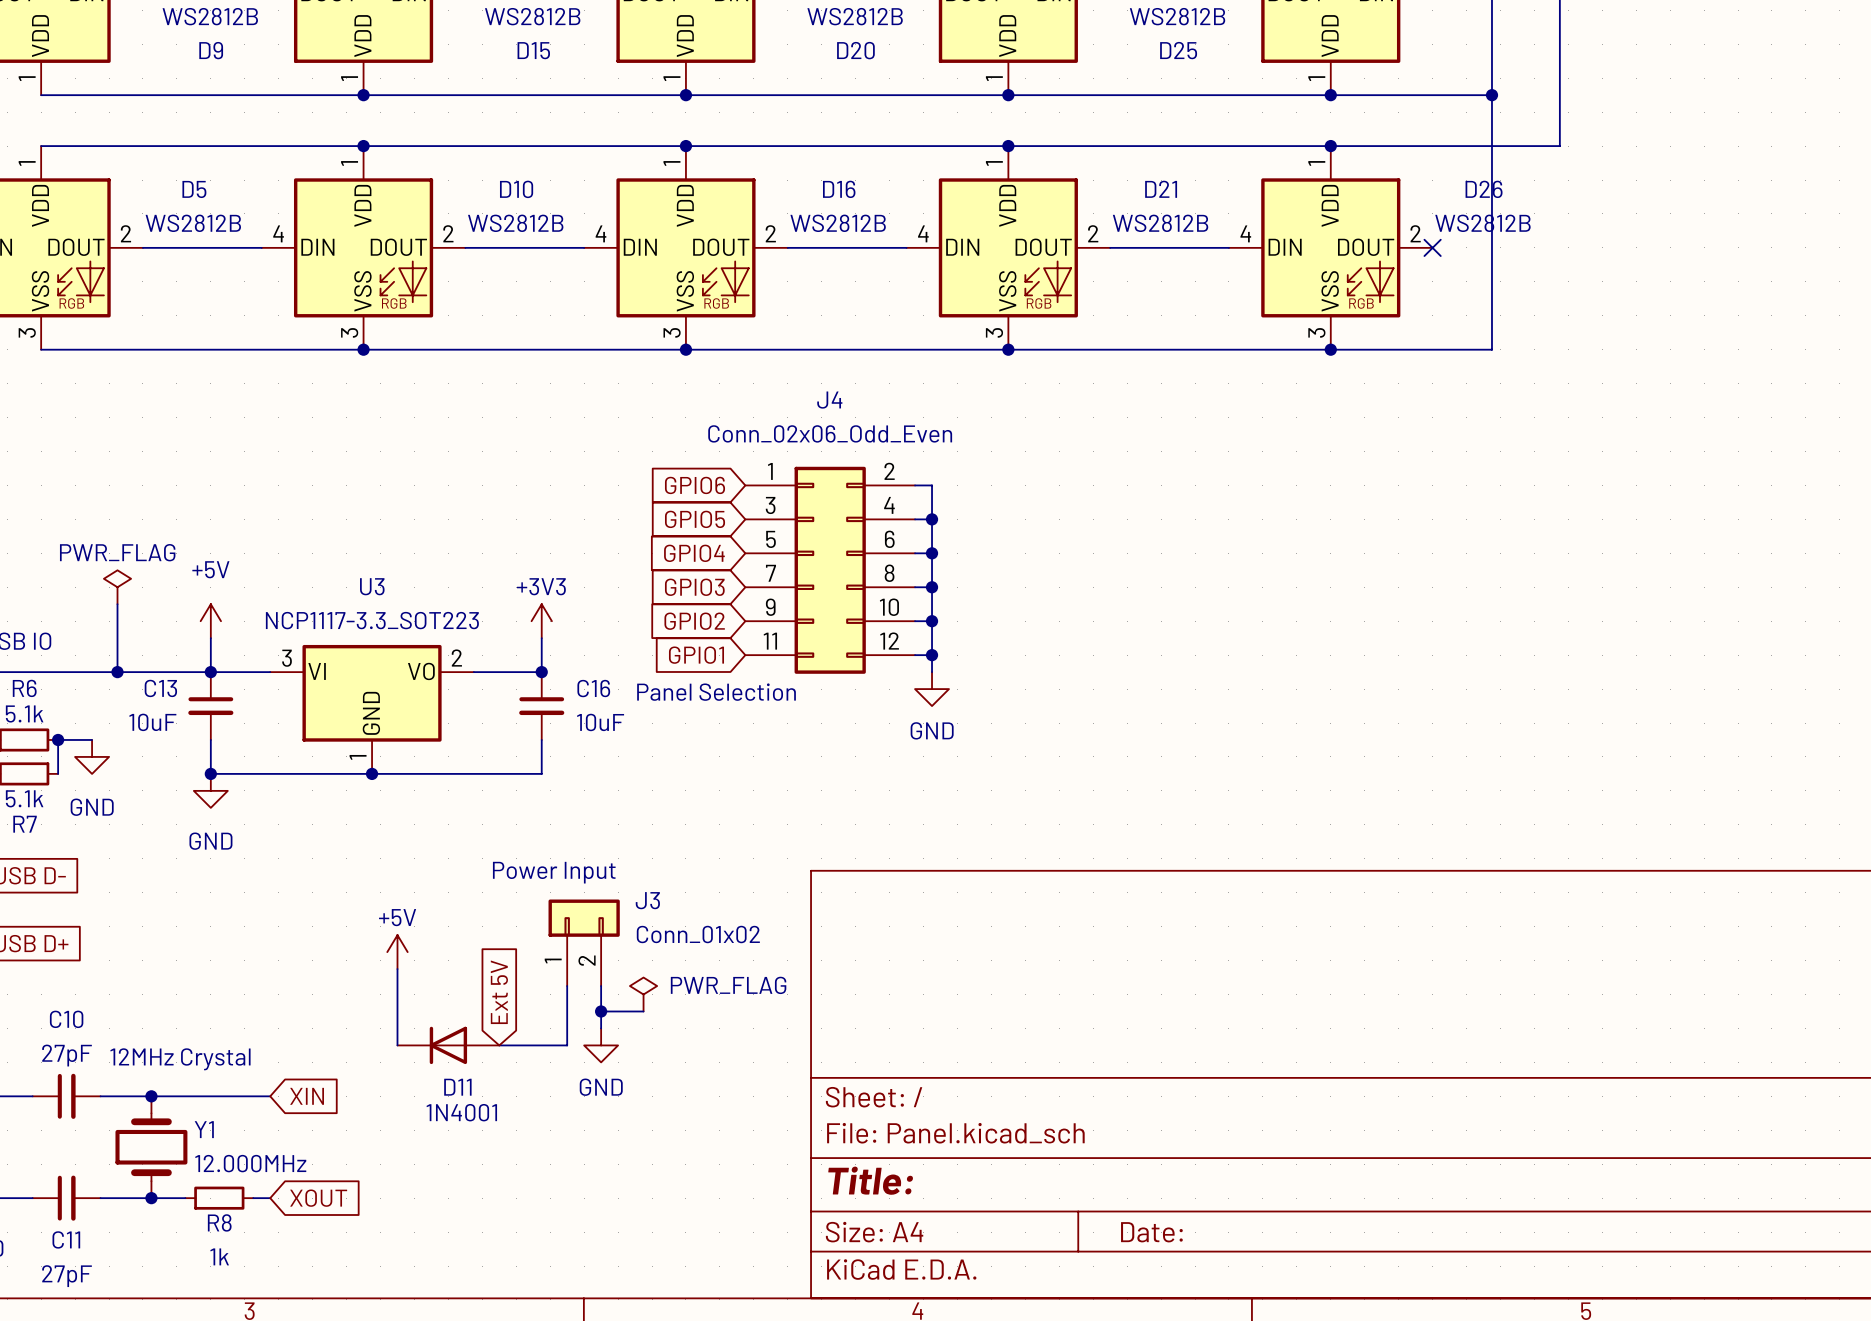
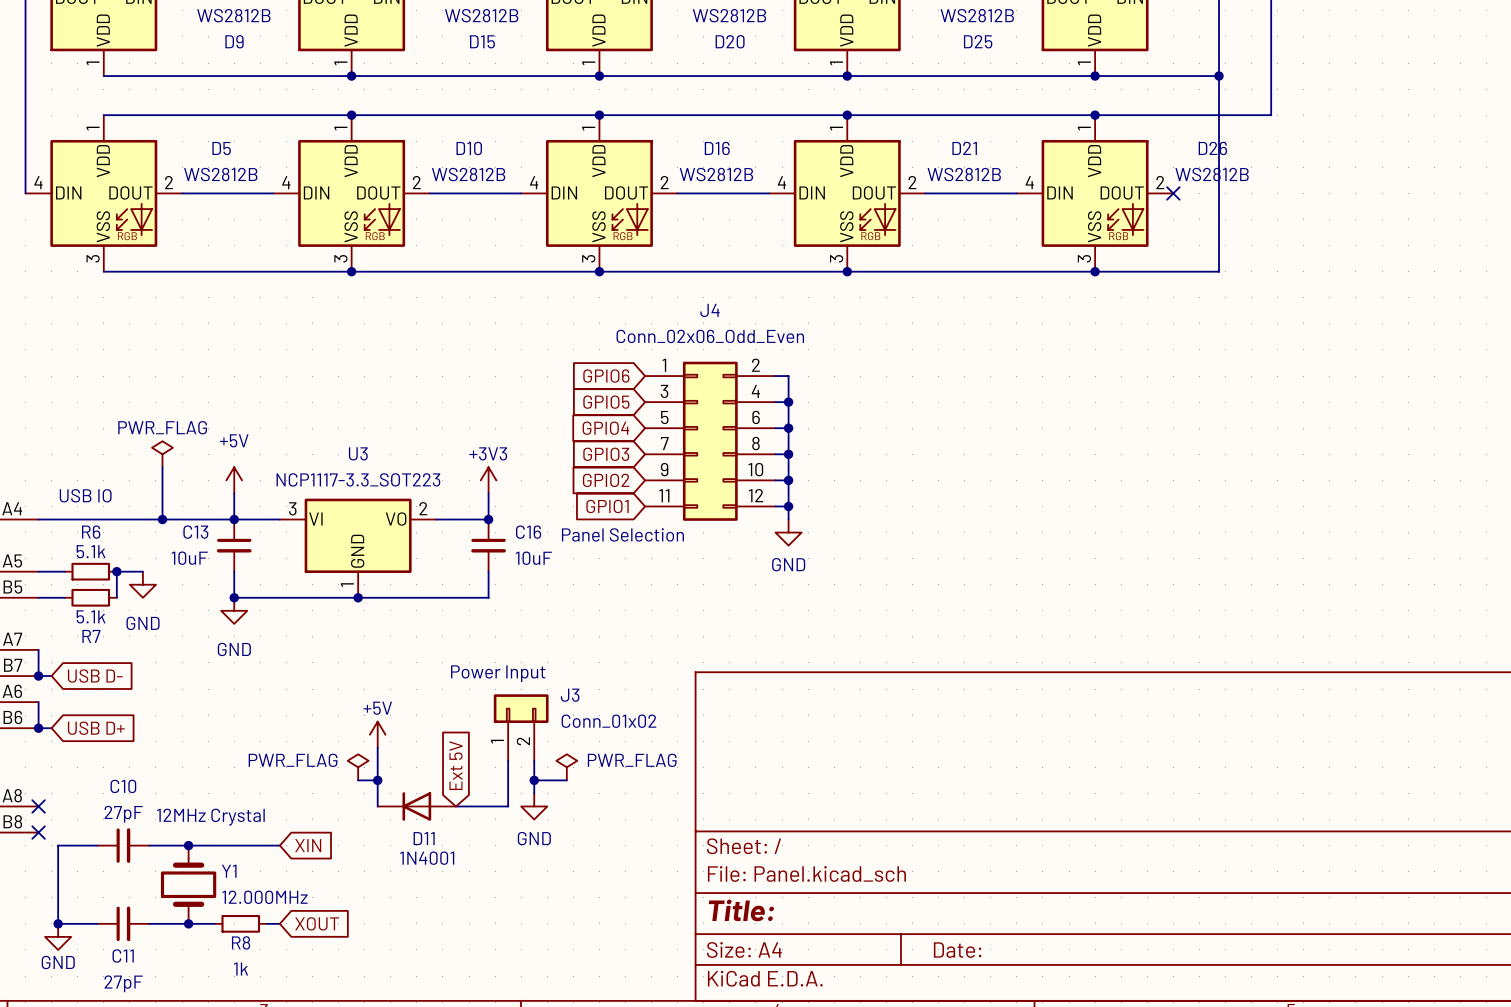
power symbol: none -> PWR_FLAG (358, 767)
wire: none -> (358, 780) (377, 780)
junction: none -> (377, 780)

